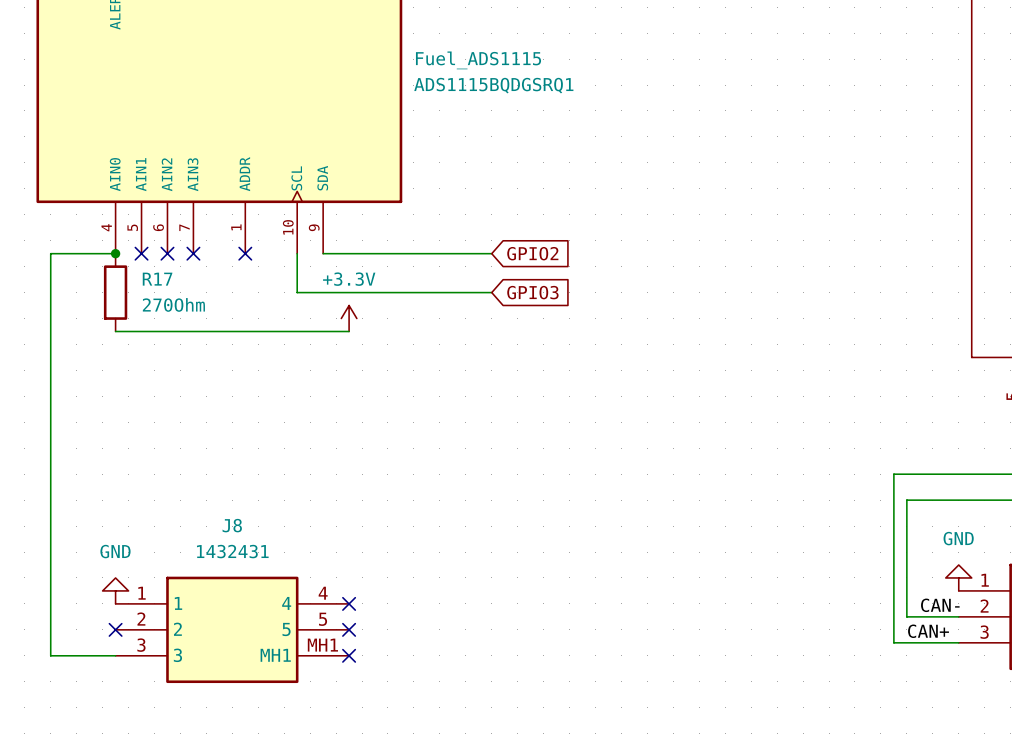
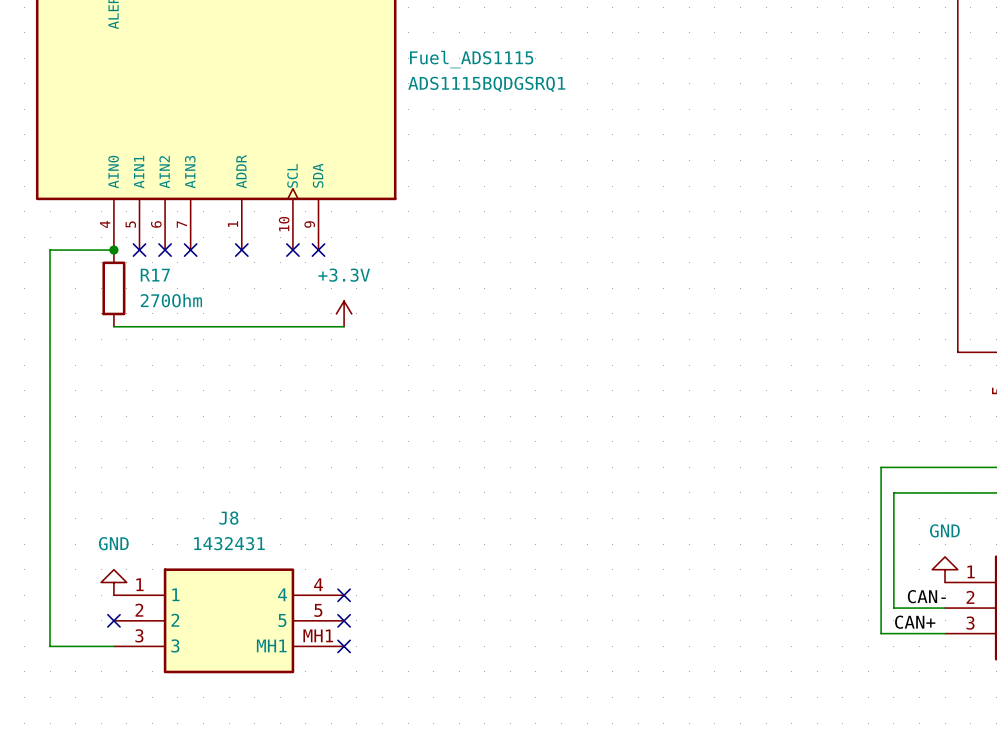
wire: (297, 253) (297, 292) (491, 292) -> none
no-connect mark: none -> (292, 250)
wire: (323, 253) (491, 253) -> none
no-connect mark: none -> (318, 250)
global label: GPIO2 (532, 253) -> none
global label: GPIO3 (532, 292) -> none

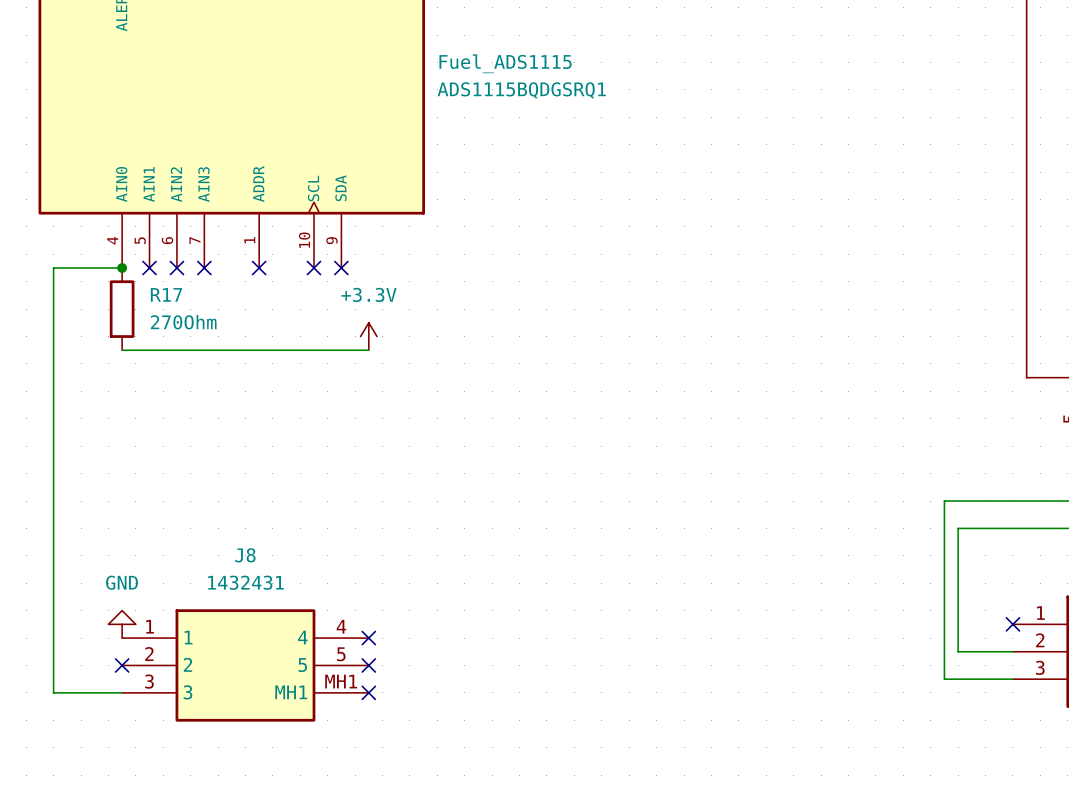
power symbol: GND (945, 569) -> none
no-connect mark: none -> (1012, 624)
label: CAN- (926, 596) -> none
label: CAN+ (915, 622) -> none

